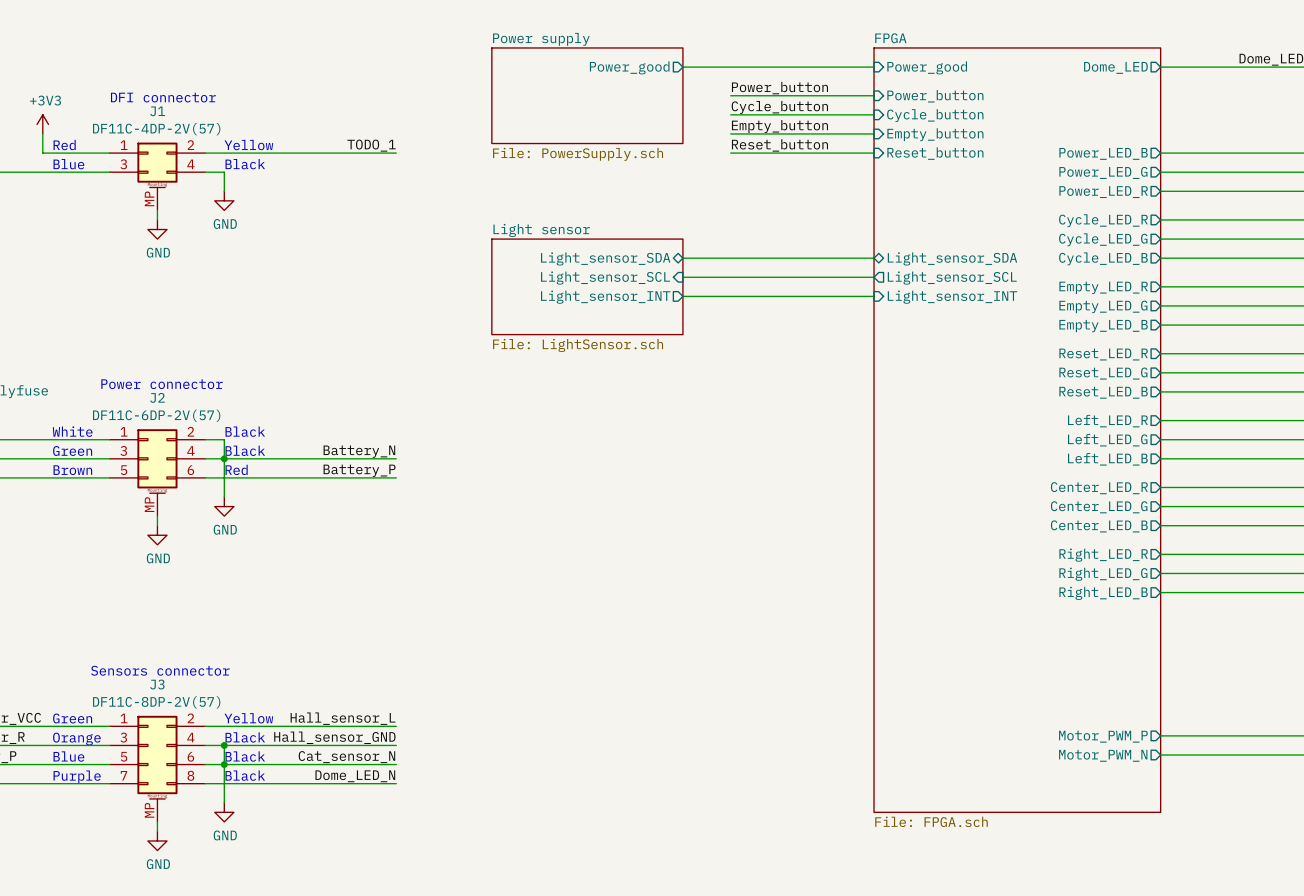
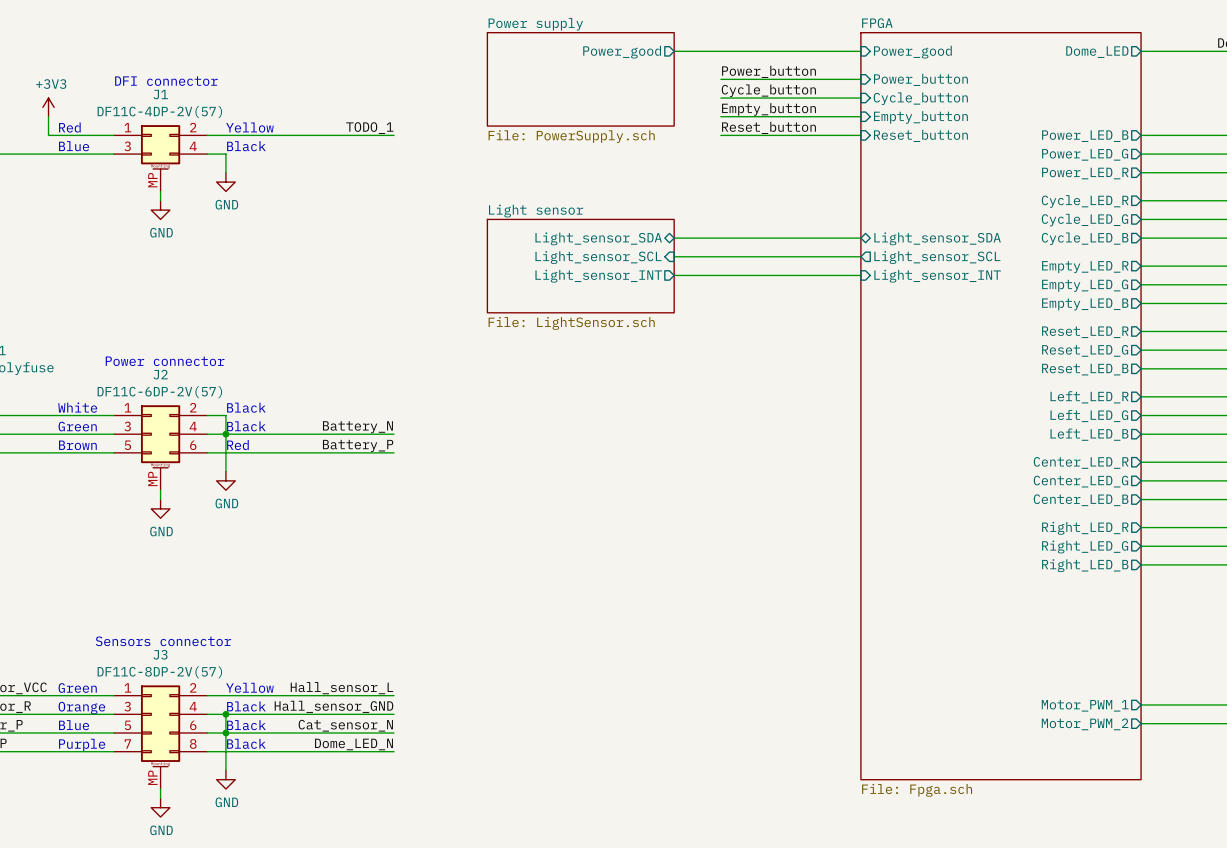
sheet pin: Motor_PWM_P (1103, 736) -> Motor_PWM_1 (1085, 705)
sheet pin: Motor_PWM_N (1103, 755) -> Motor_PWM_2 (1085, 724)
sheet FPGA value: File: FPGA.sch (931, 821) -> File: Fpga.sch (917, 790)

